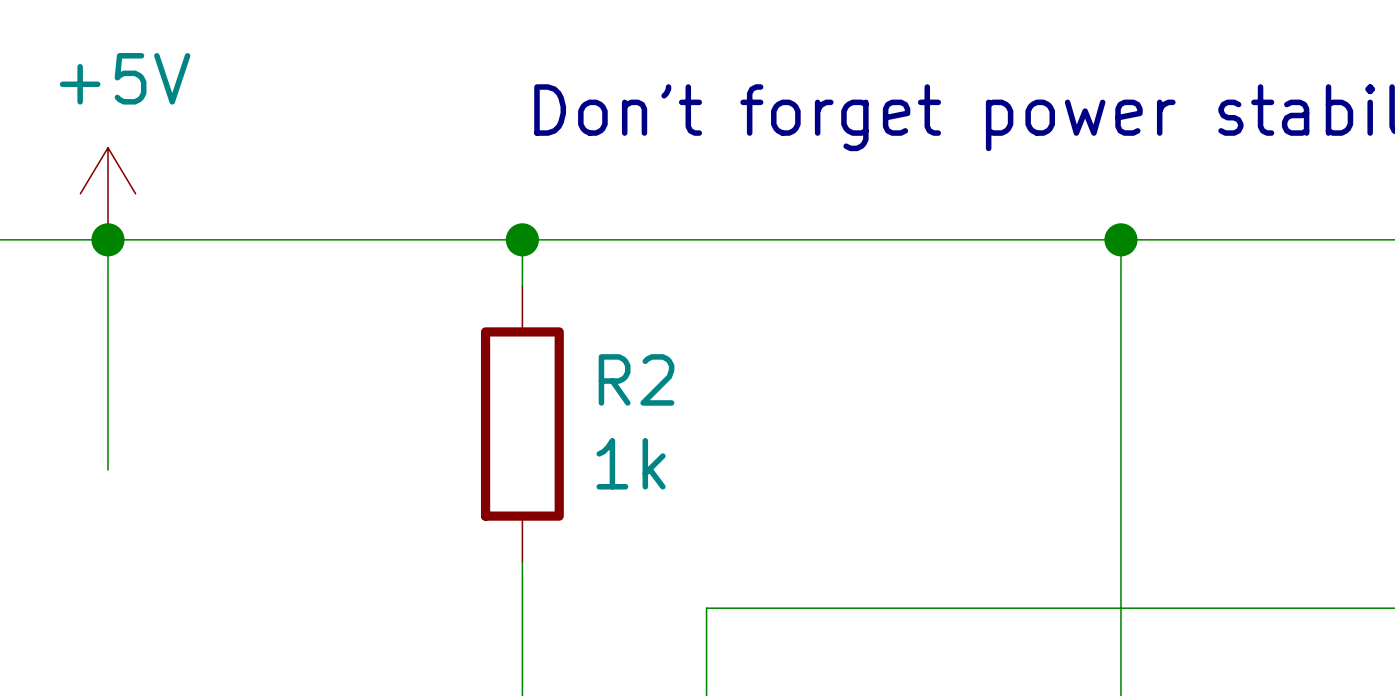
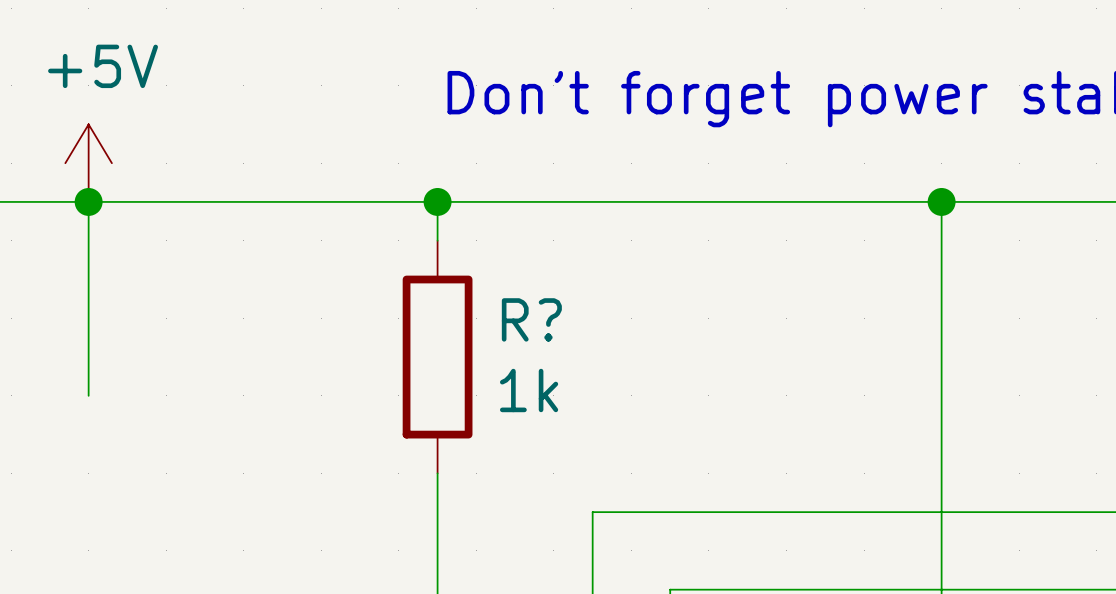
R2 name: R2 (636, 379) -> R? (531, 319)

